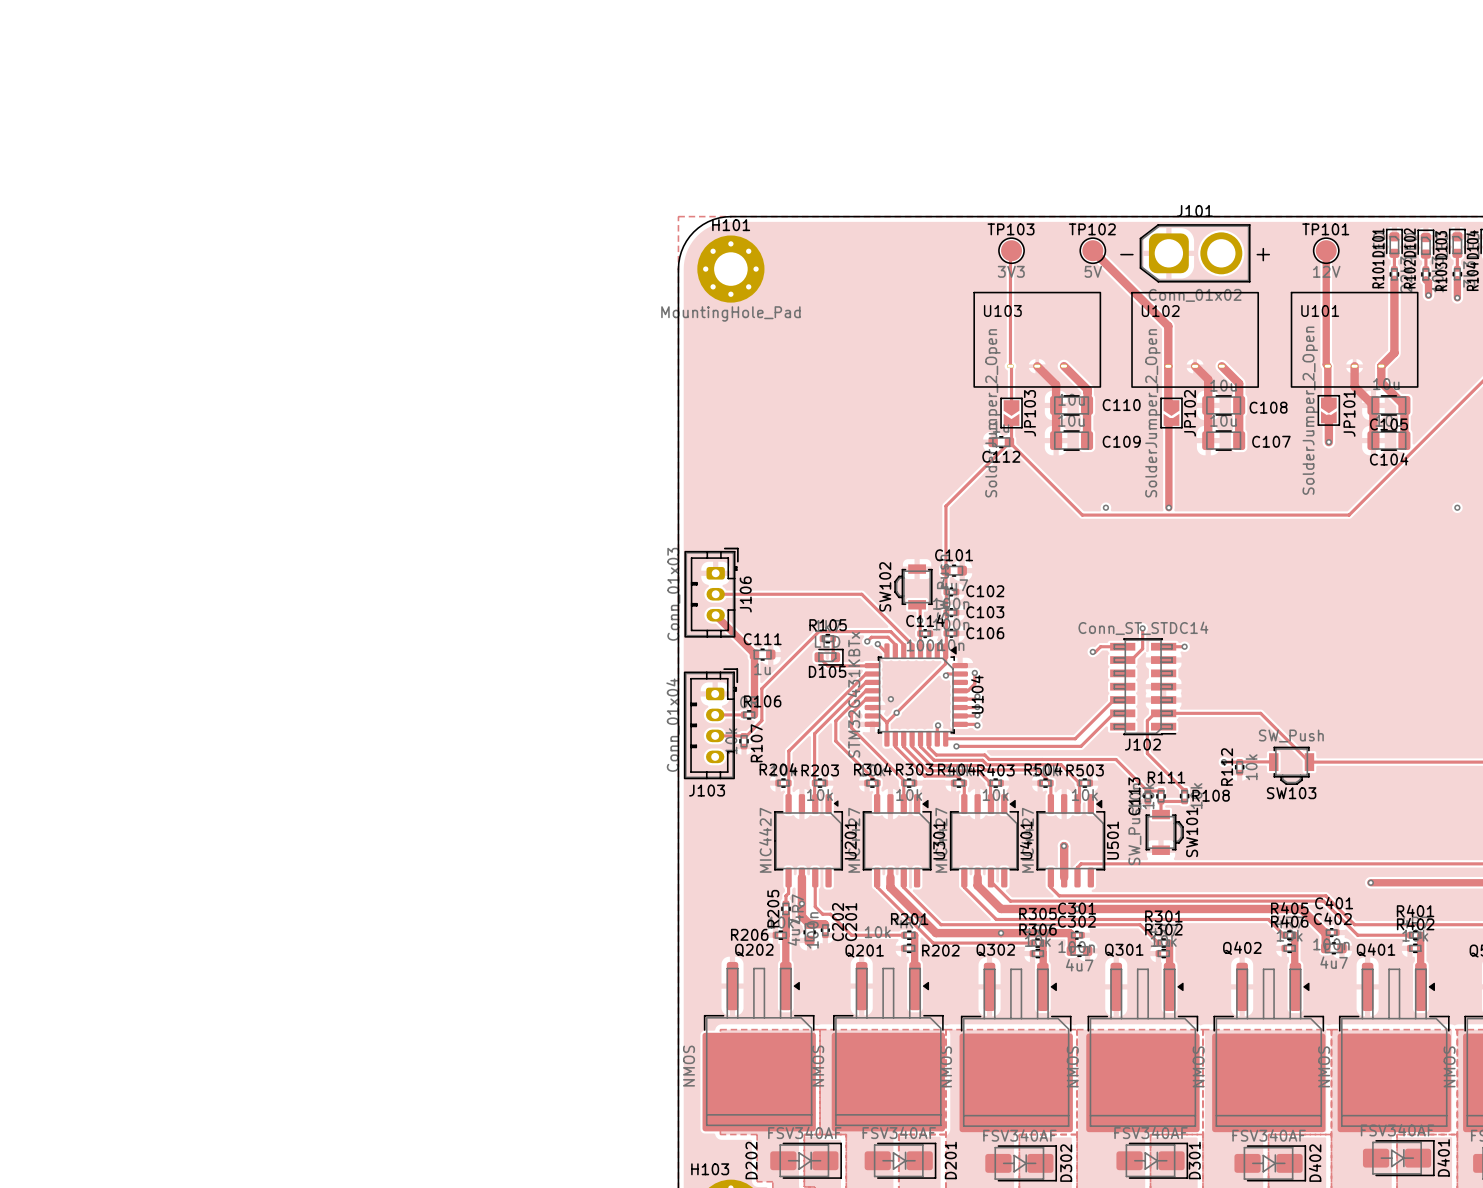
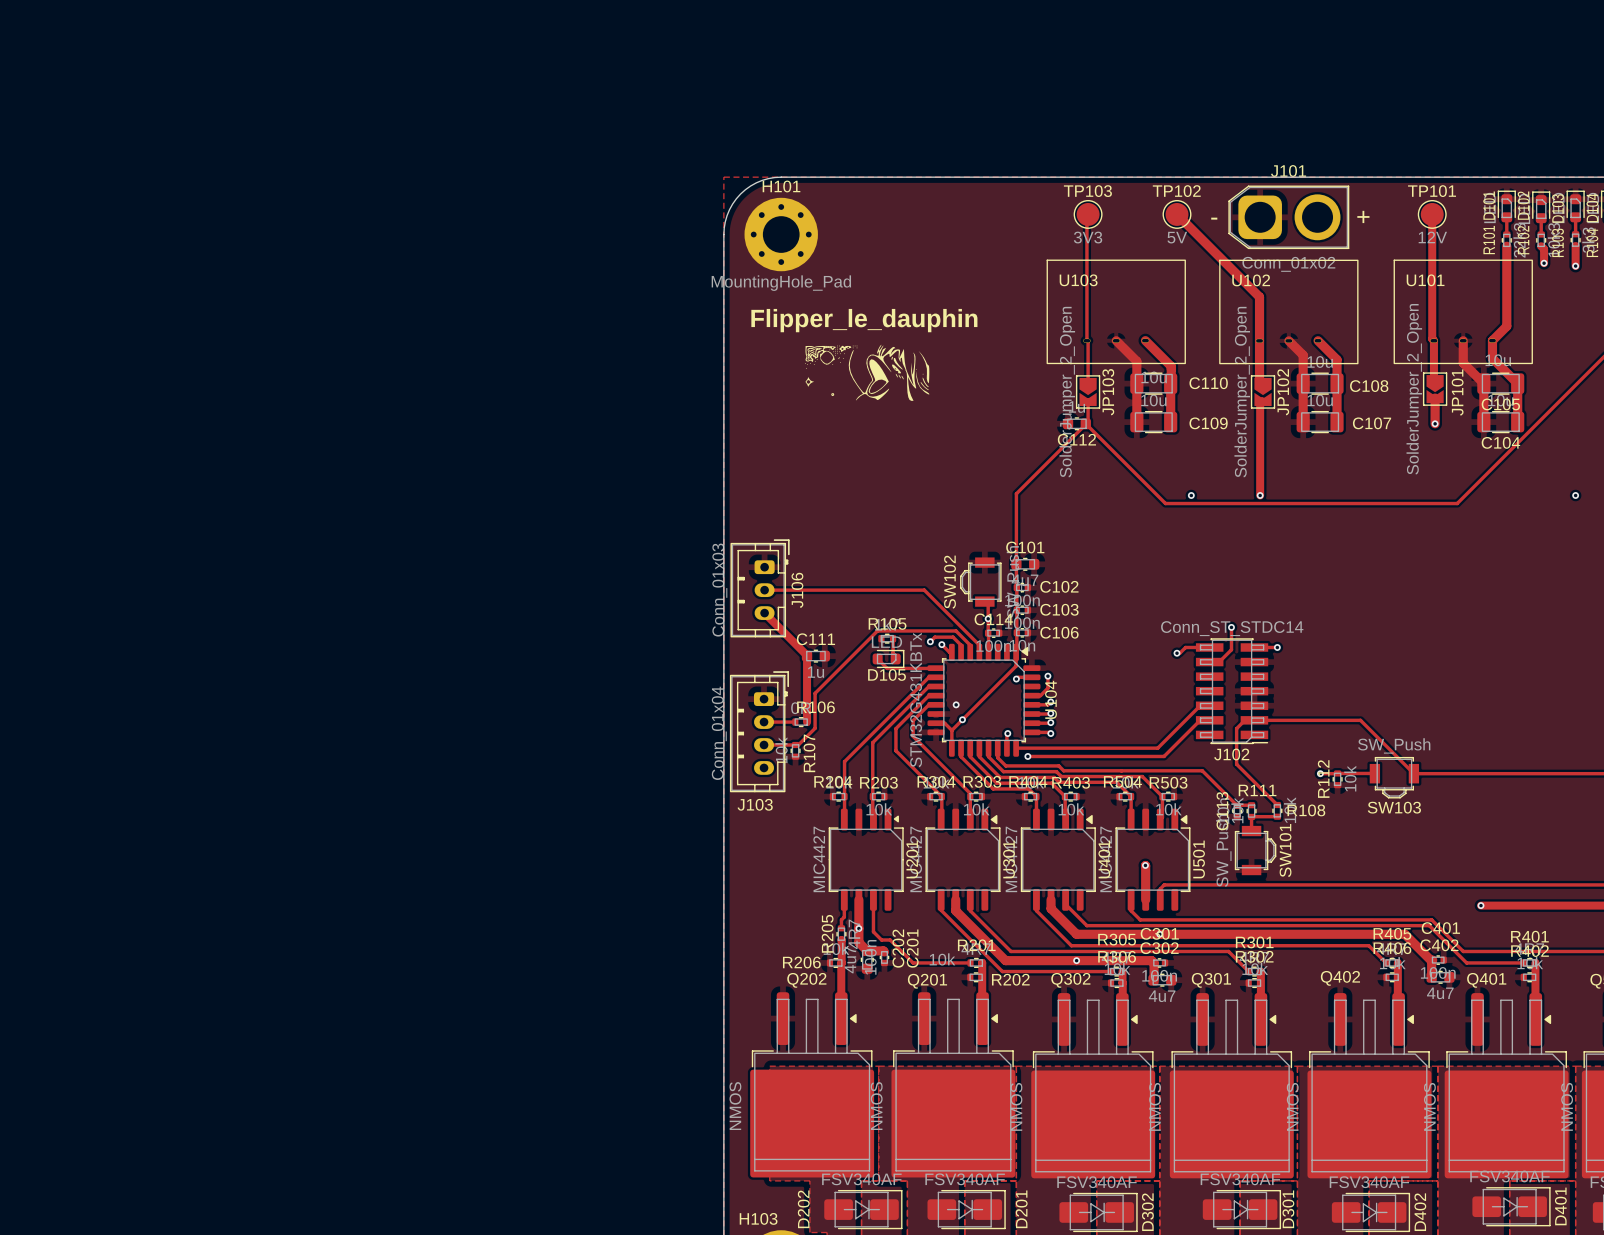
text: none -> Flipper_le_dauphin (864, 320)
drawing: none -> [805, 344, 930, 401]

